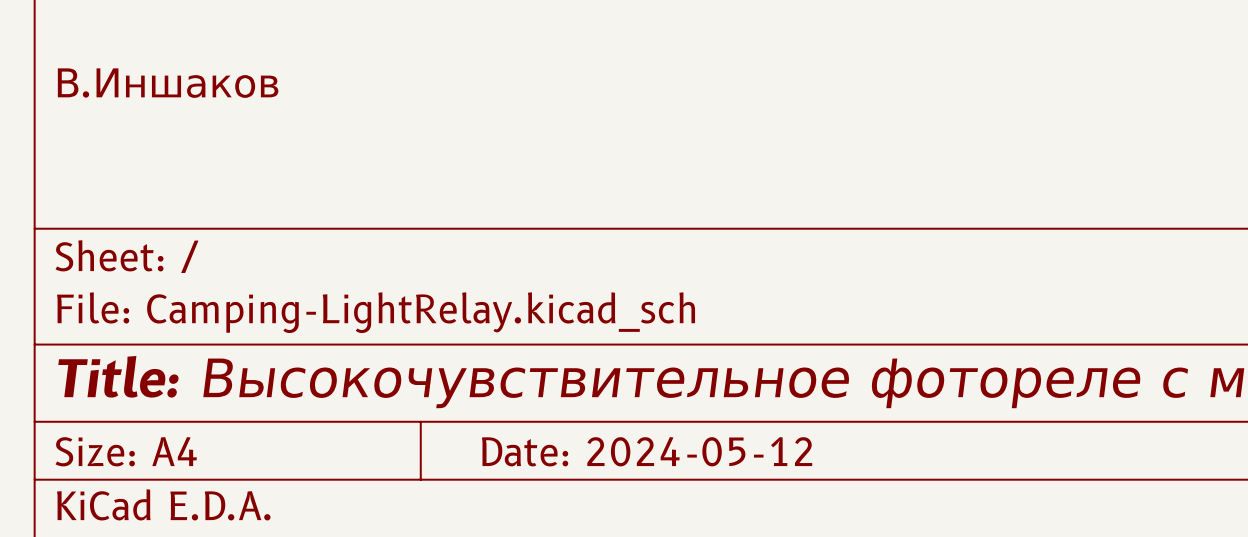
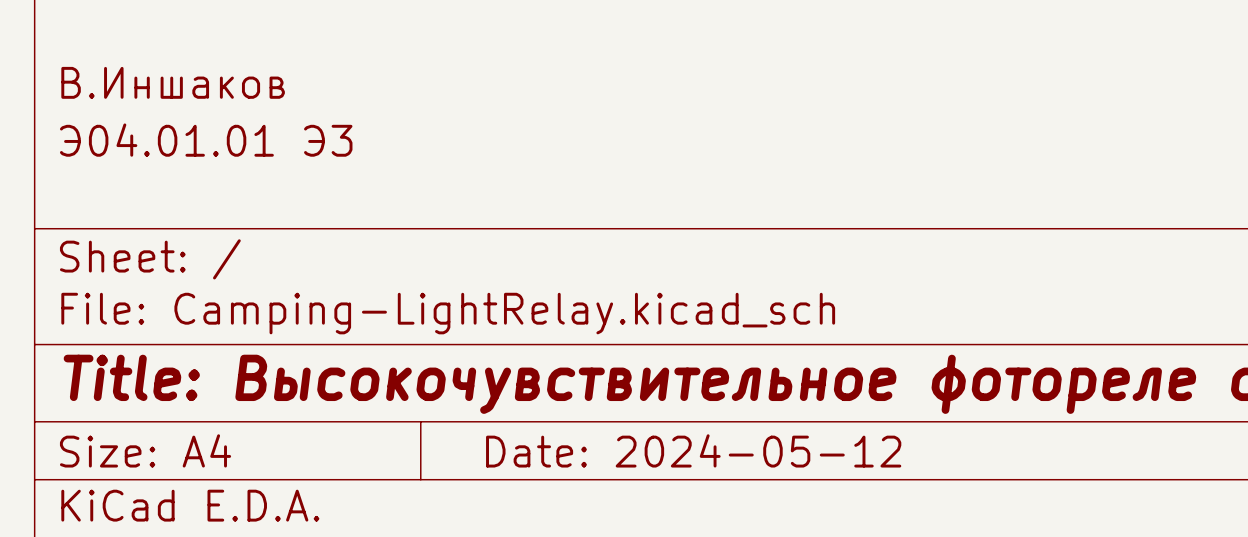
title block: none -> Э04.01.01 Э3 (206, 140)

